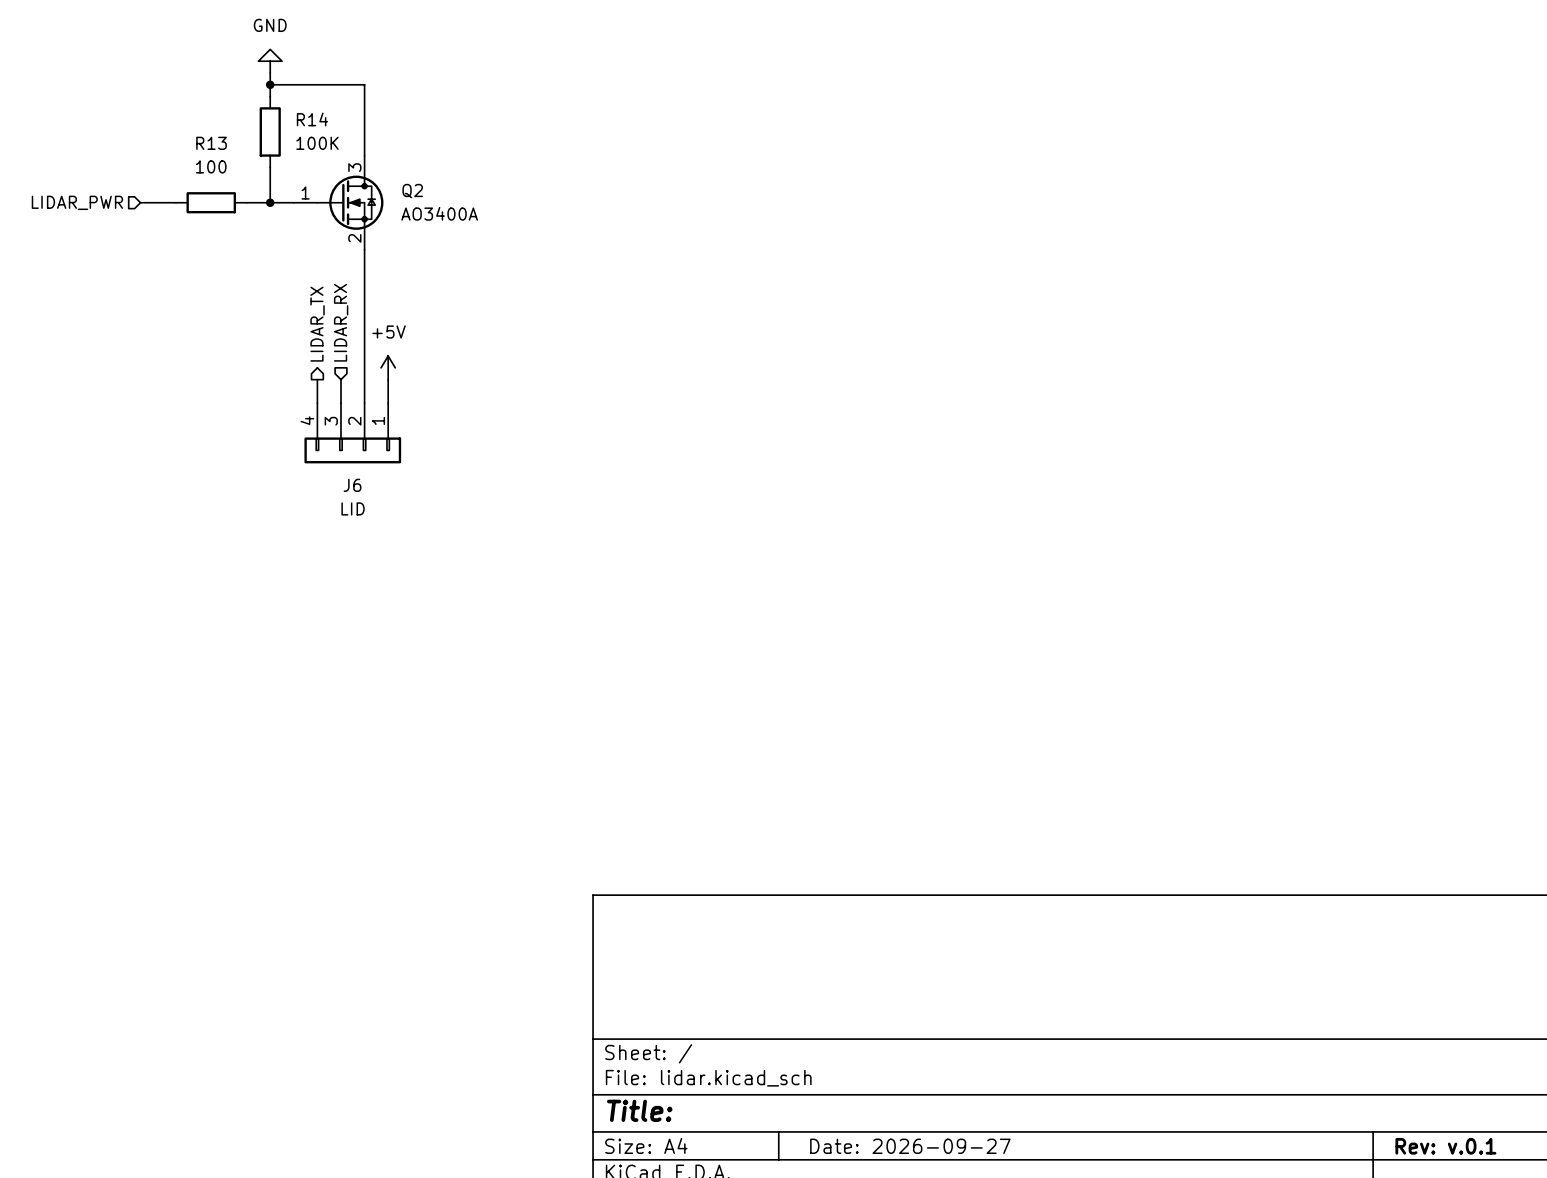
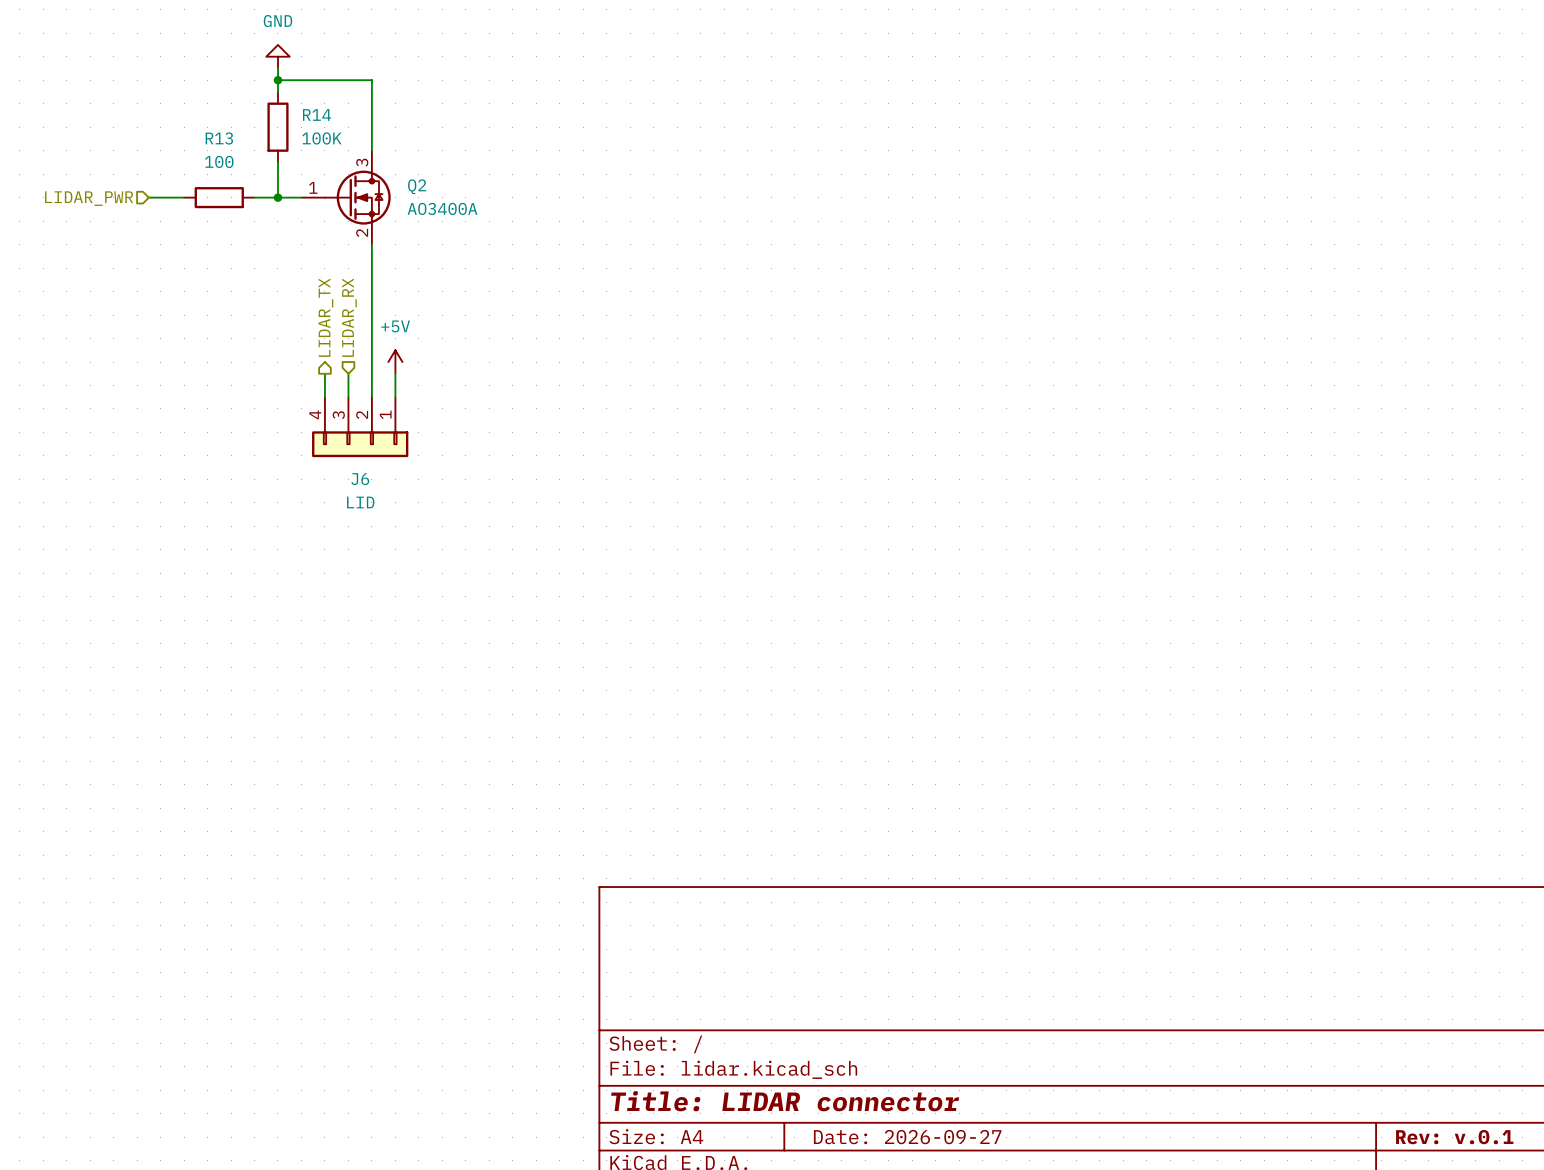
title block: Title: (639, 1110) -> Title: LIDAR connector (785, 1101)

